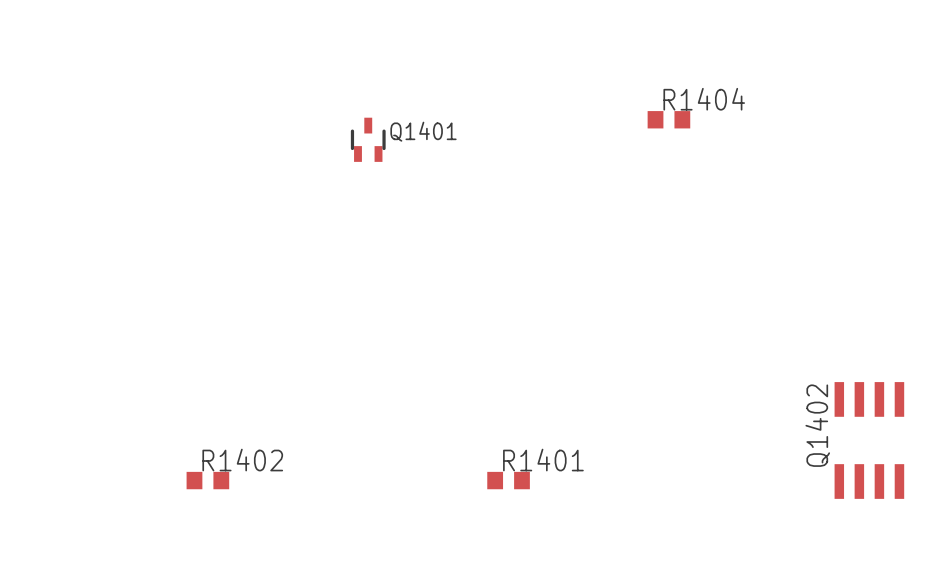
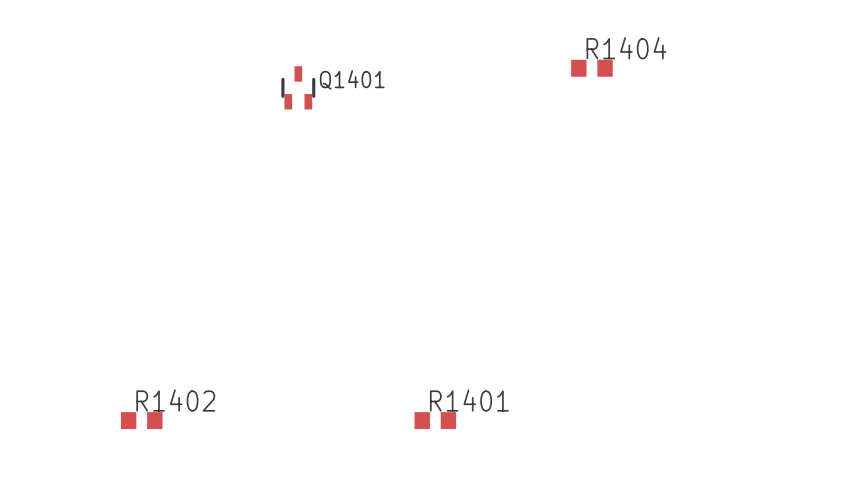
Q1402: (869, 440) -> none

